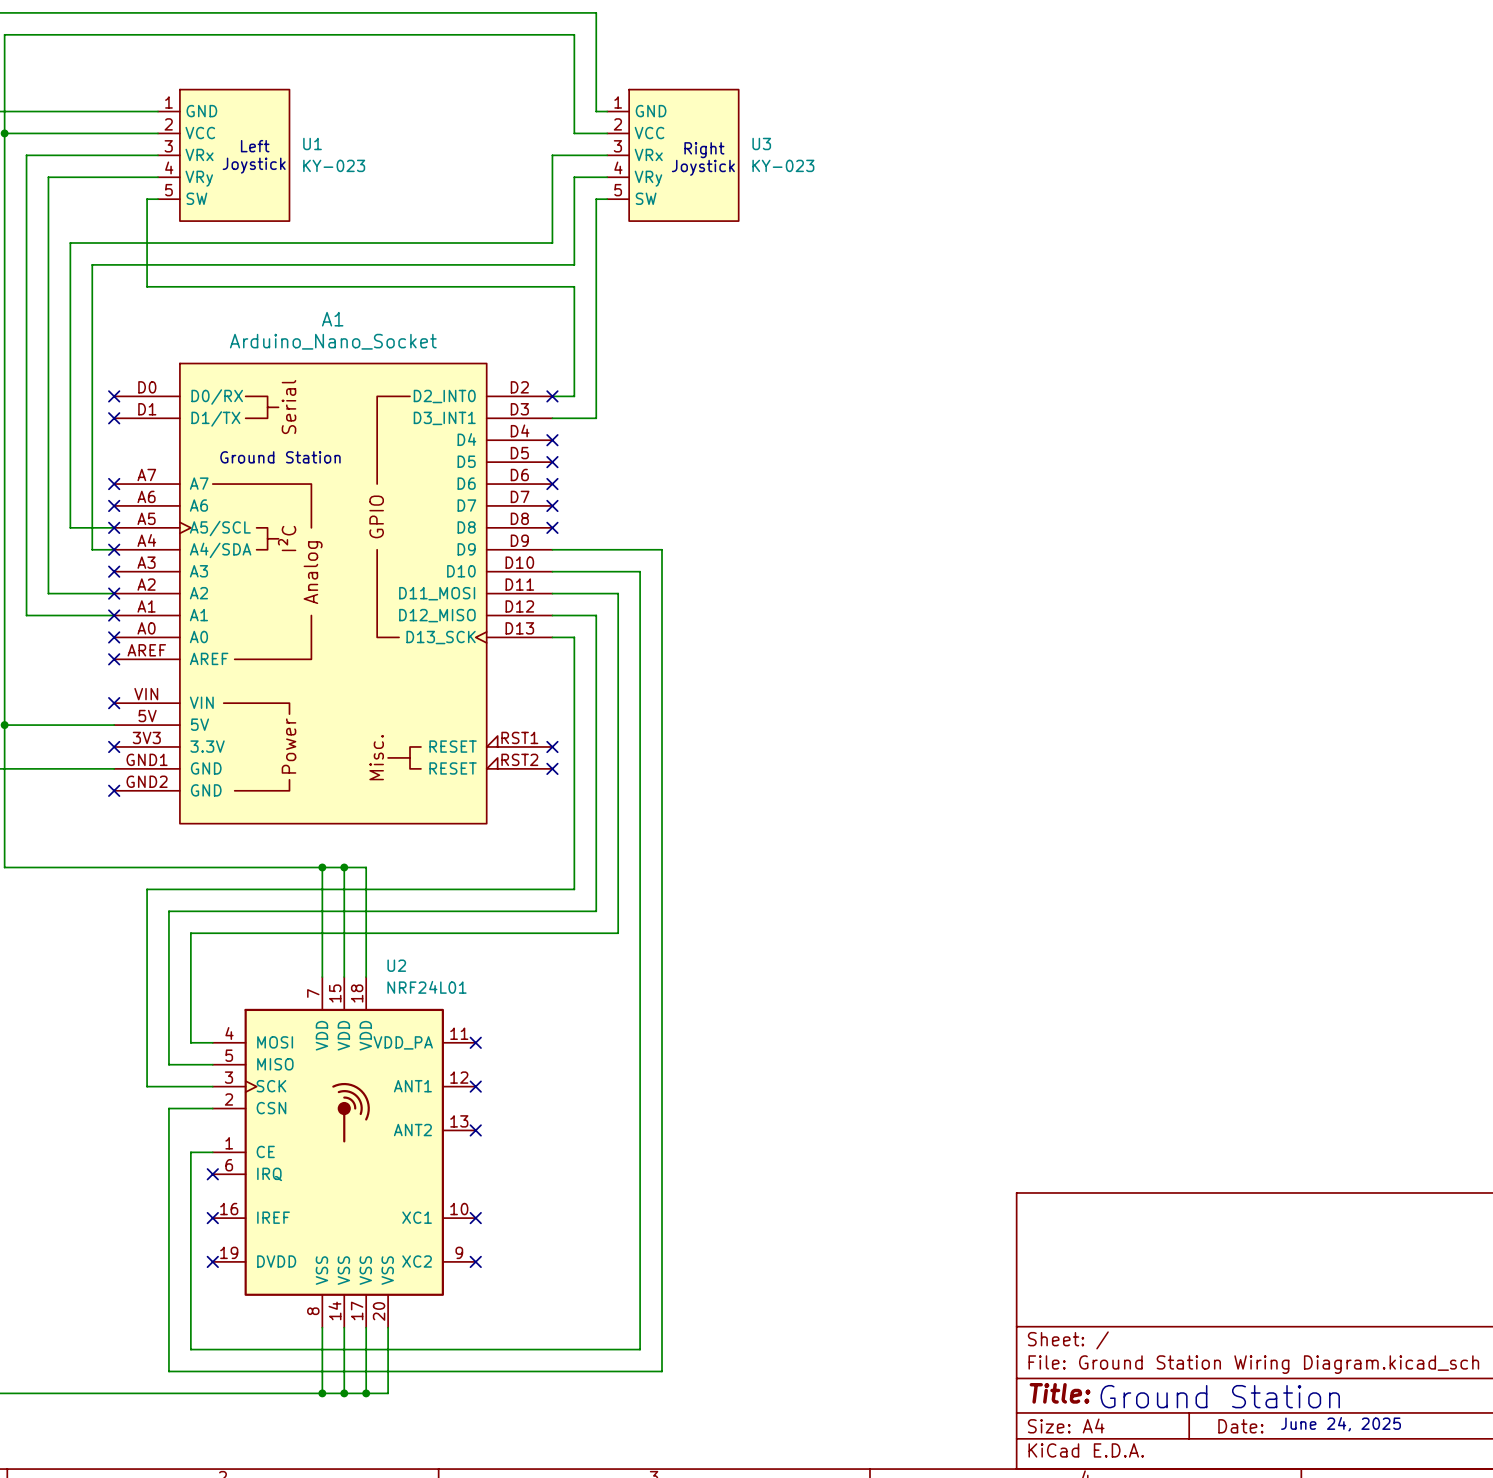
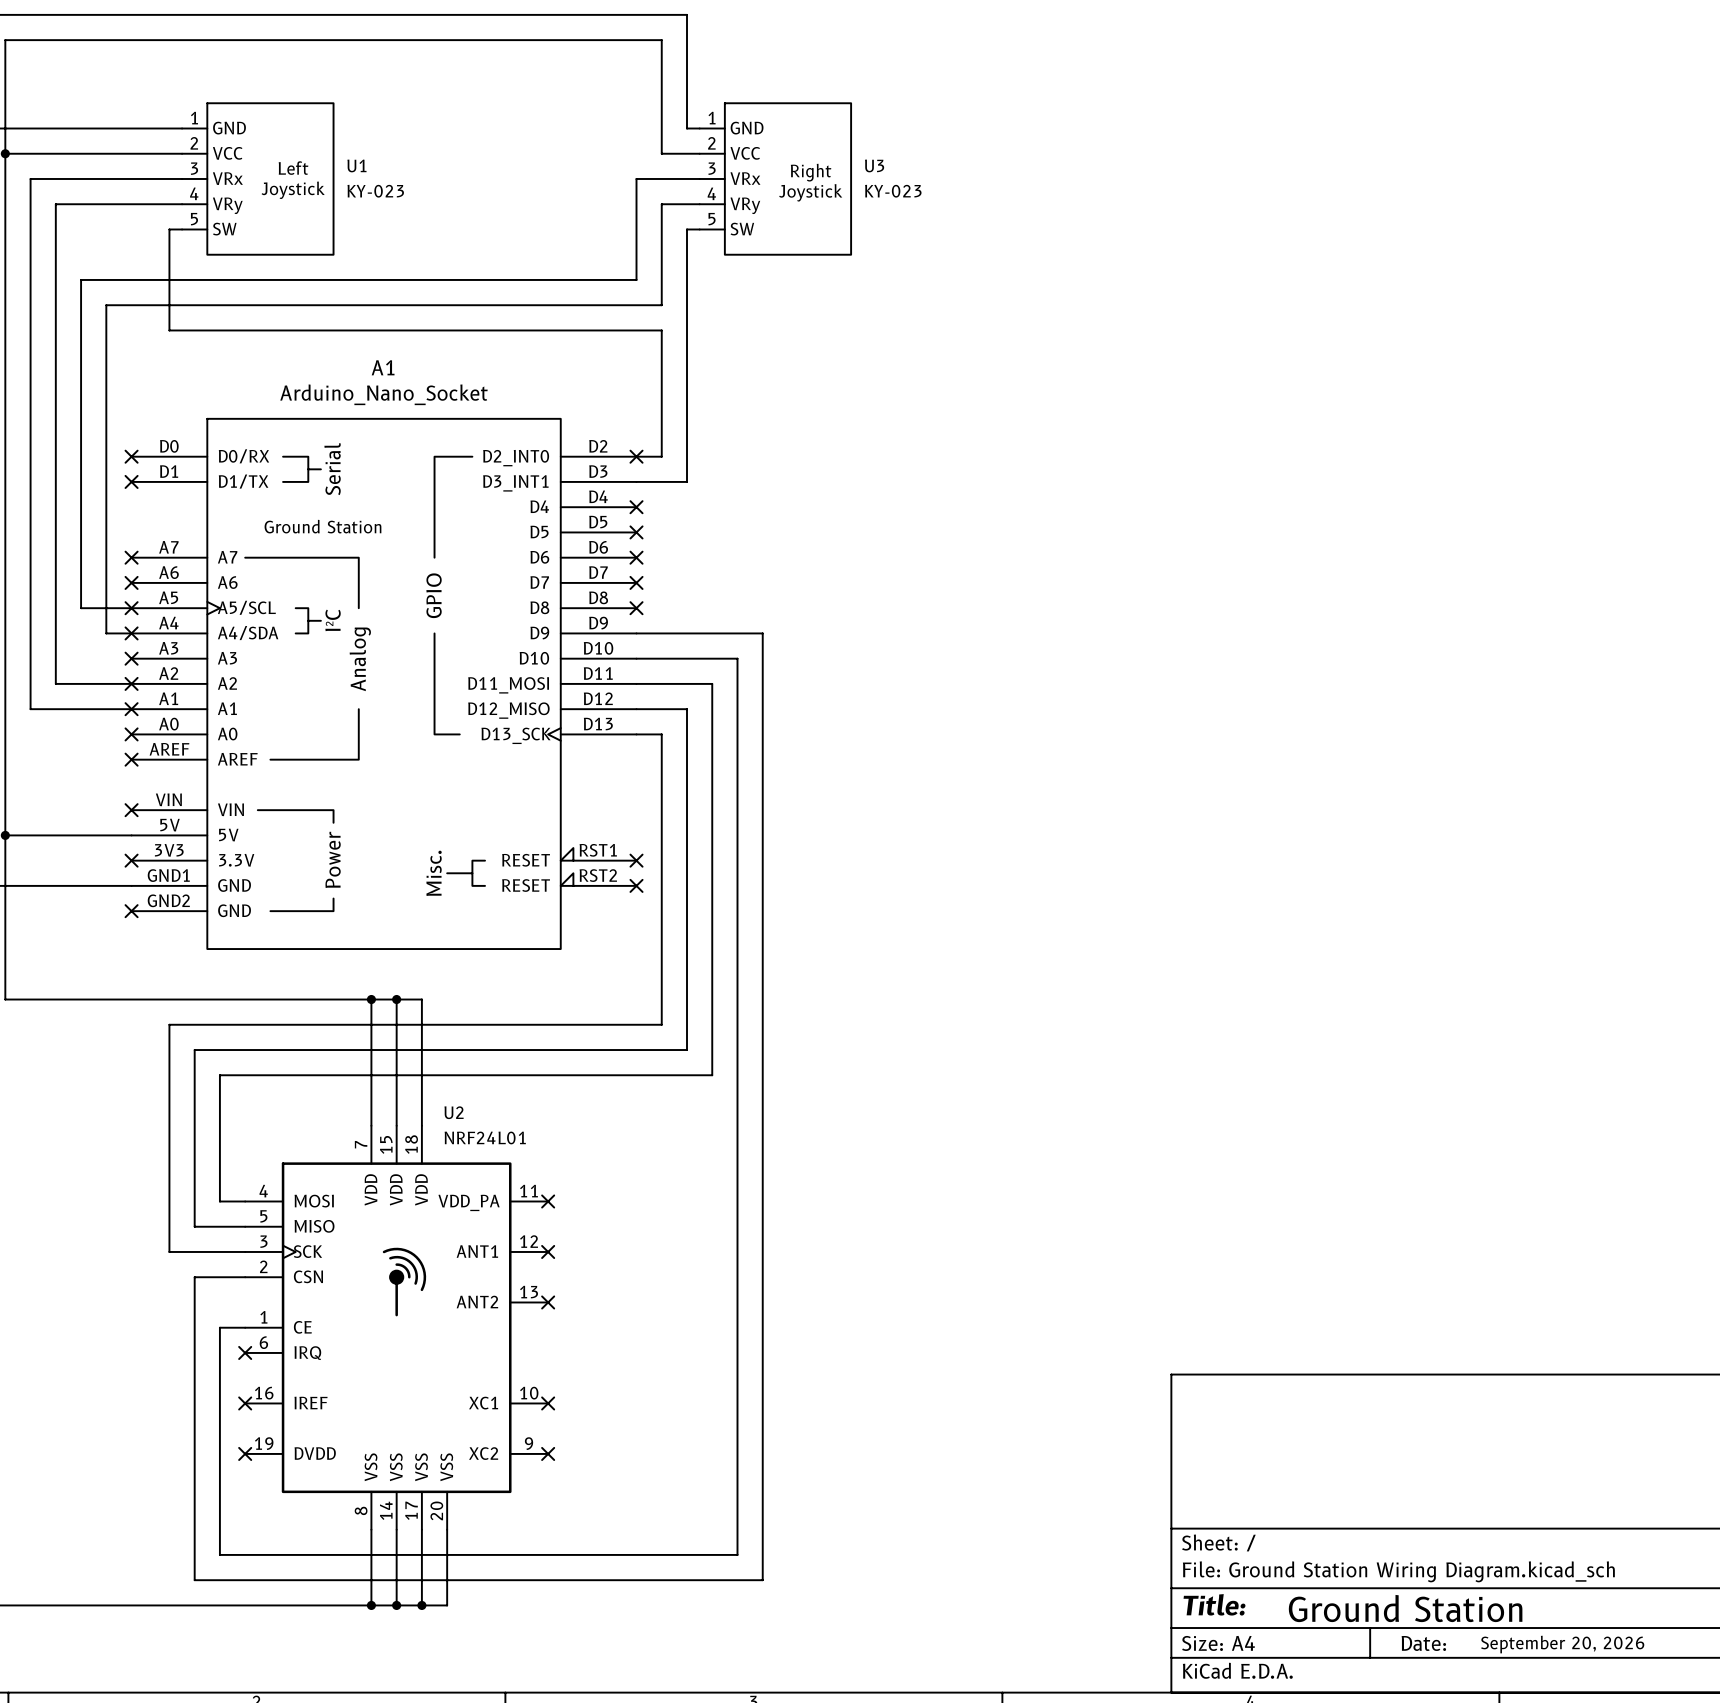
text: June 24, 2025 (1341, 1424) -> none
text: none -> September 20, 2026 (1562, 1644)

